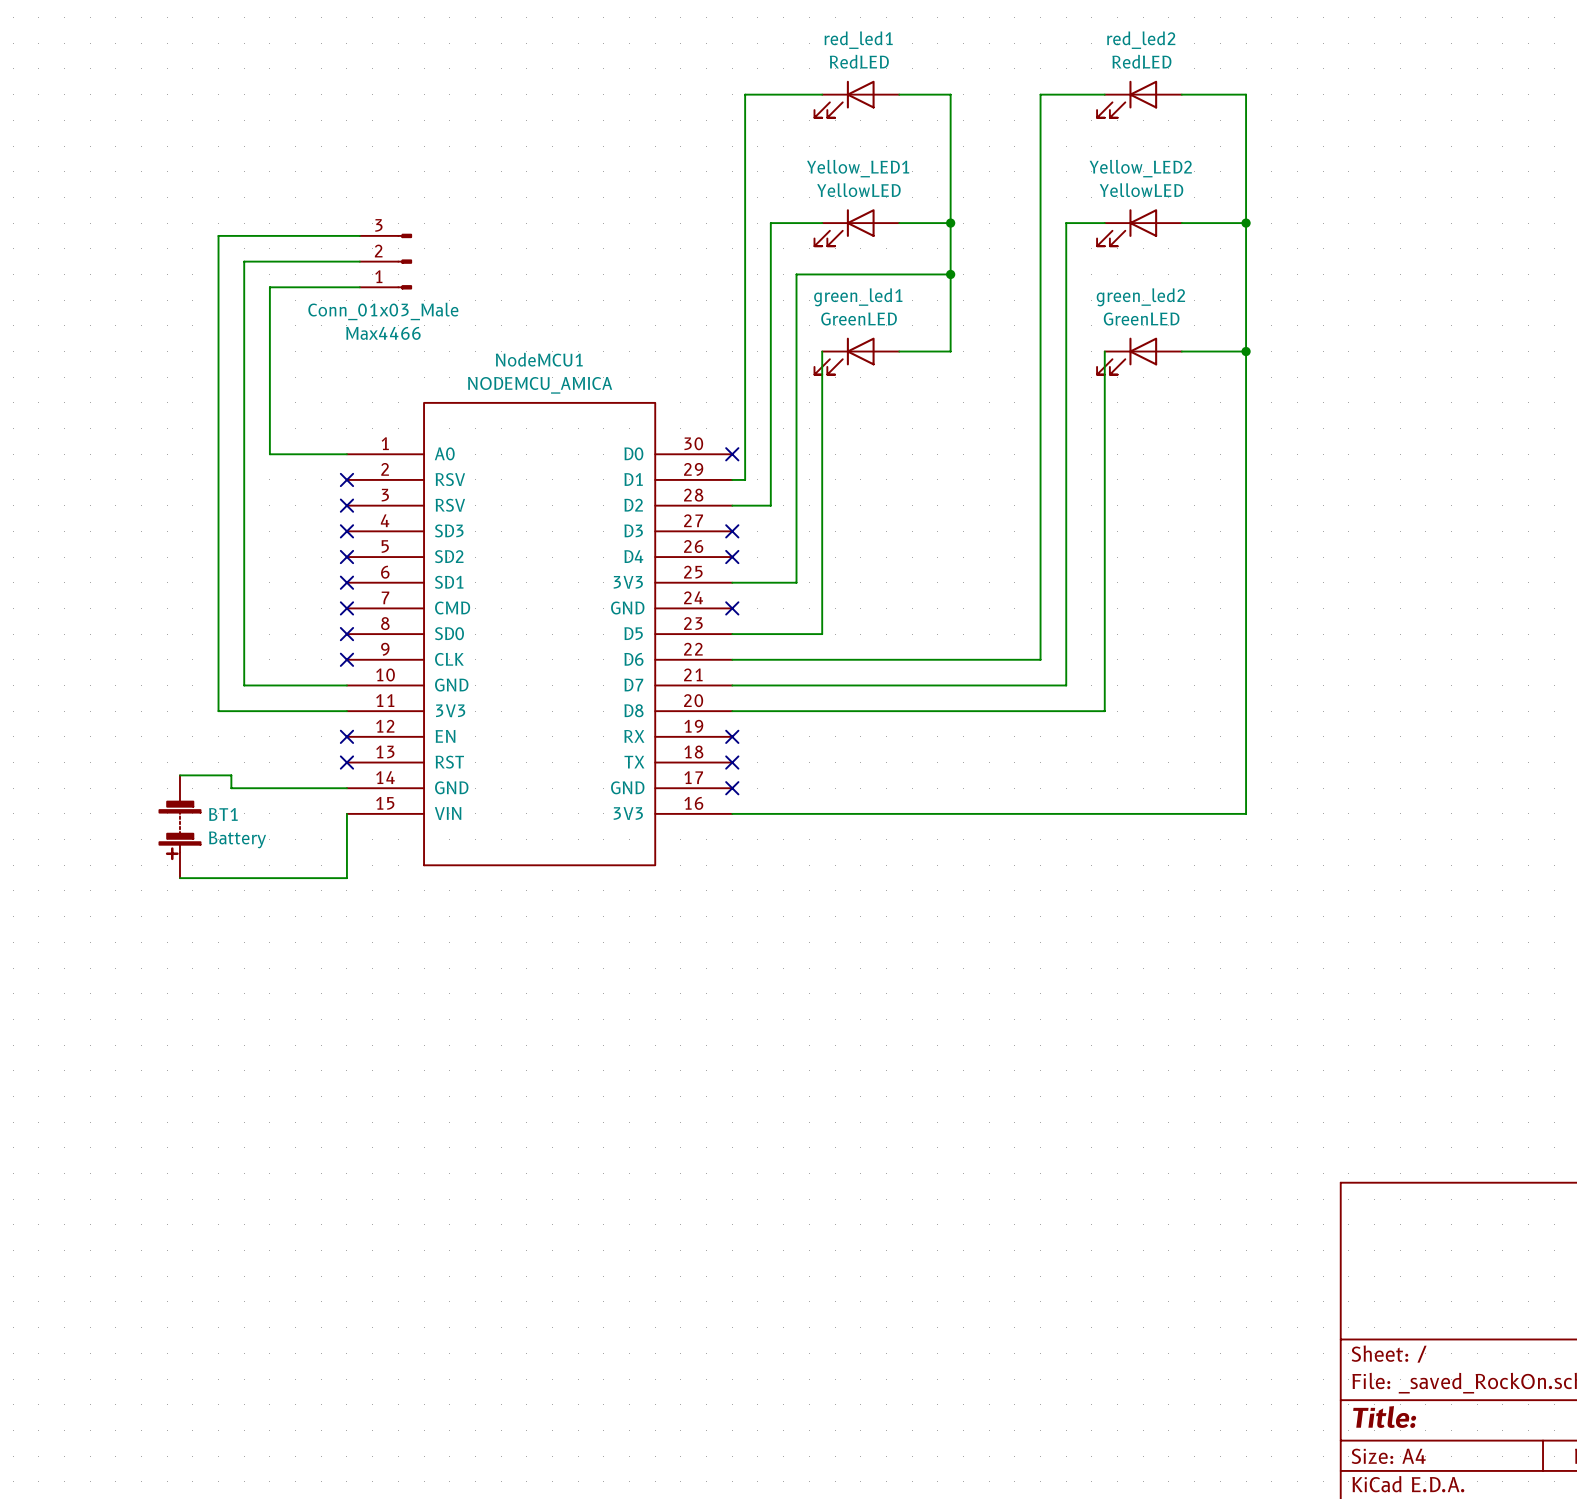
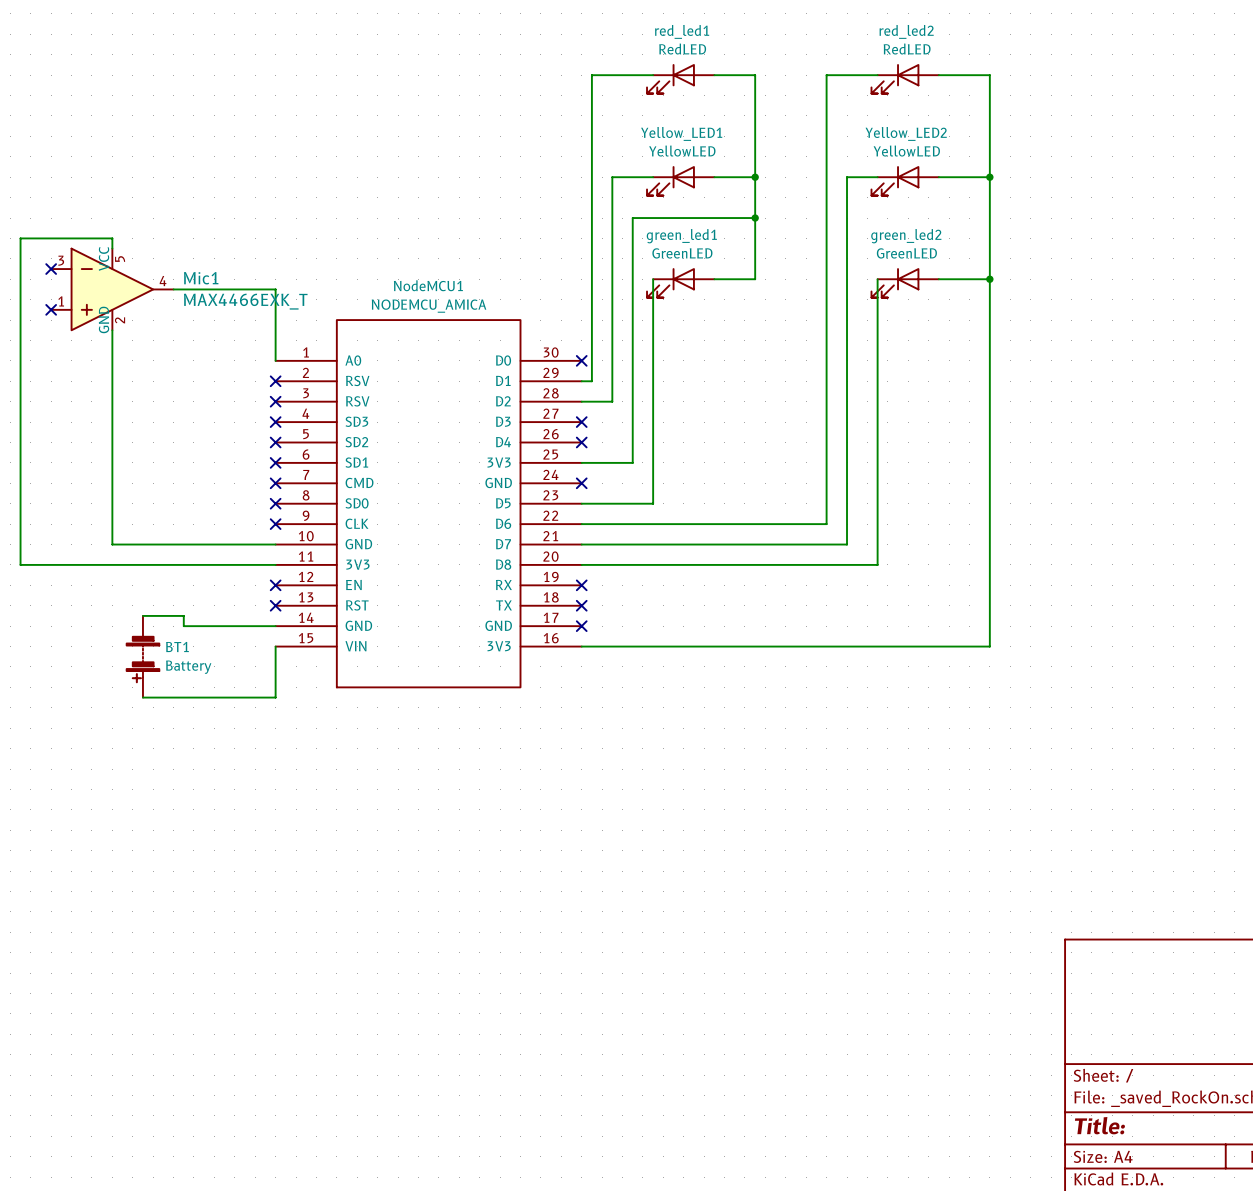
wire: (359, 235) (218, 235) (218, 711) -> (112, 248) (112, 238) (20, 238) (20, 564) (173, 564)
wire: (359, 261) (244, 261) (244, 685) -> (112, 330) (112, 544) (193, 544)
Max4466: Conn_01x03_Male (385, 261) -> none
wire: (359, 287) (269, 287) (269, 454) (346, 454) -> (173, 289) (275, 289) (275, 360)
no-connect mark: none -> (51, 269)
Mic1: none -> MAX4466EXK_T (112, 289)
no-connect mark: none -> (51, 309)

